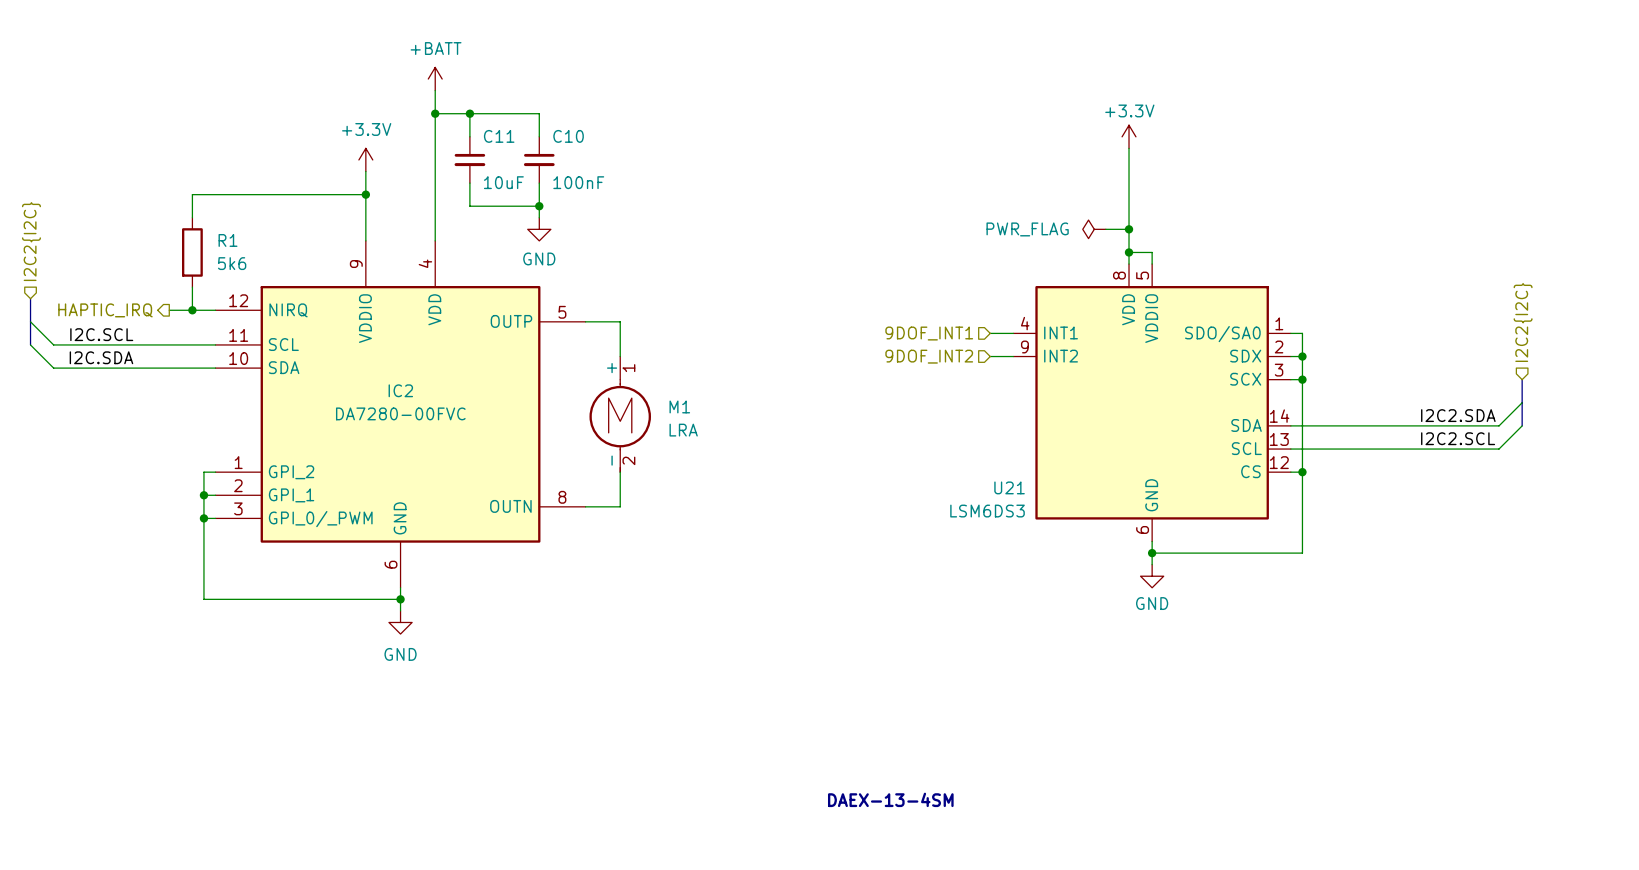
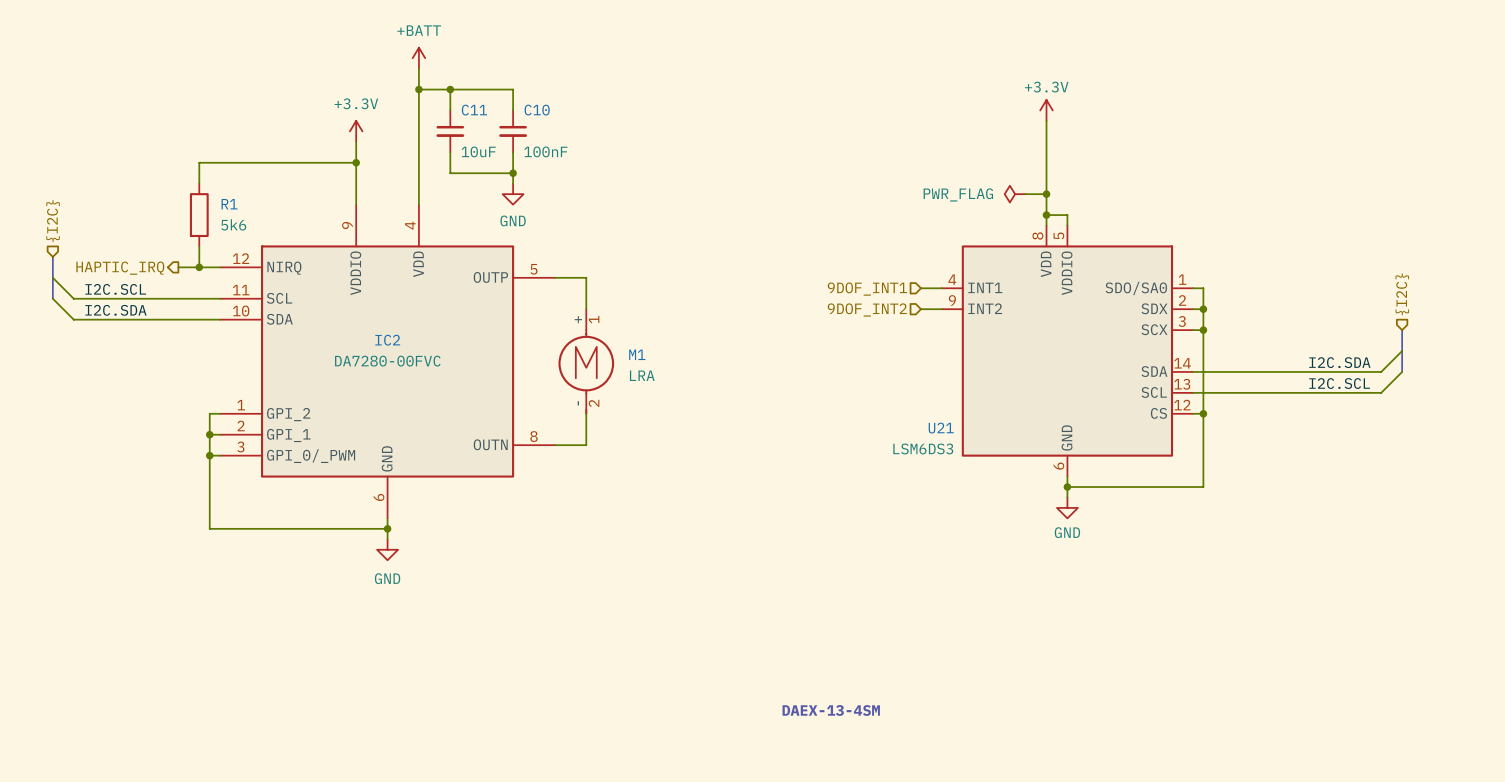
hierarchical label: I2C2{I2C} (31, 241) -> {I2C} (53, 221)
hierarchical label: I2C2{I2C} (1523, 322) -> {I2C} (1402, 294)
label: I2C2.SDA (1458, 415) -> I2C.SDA (1339, 362)
label: I2C2.SCL (1458, 438) -> I2C.SCL (1339, 383)

